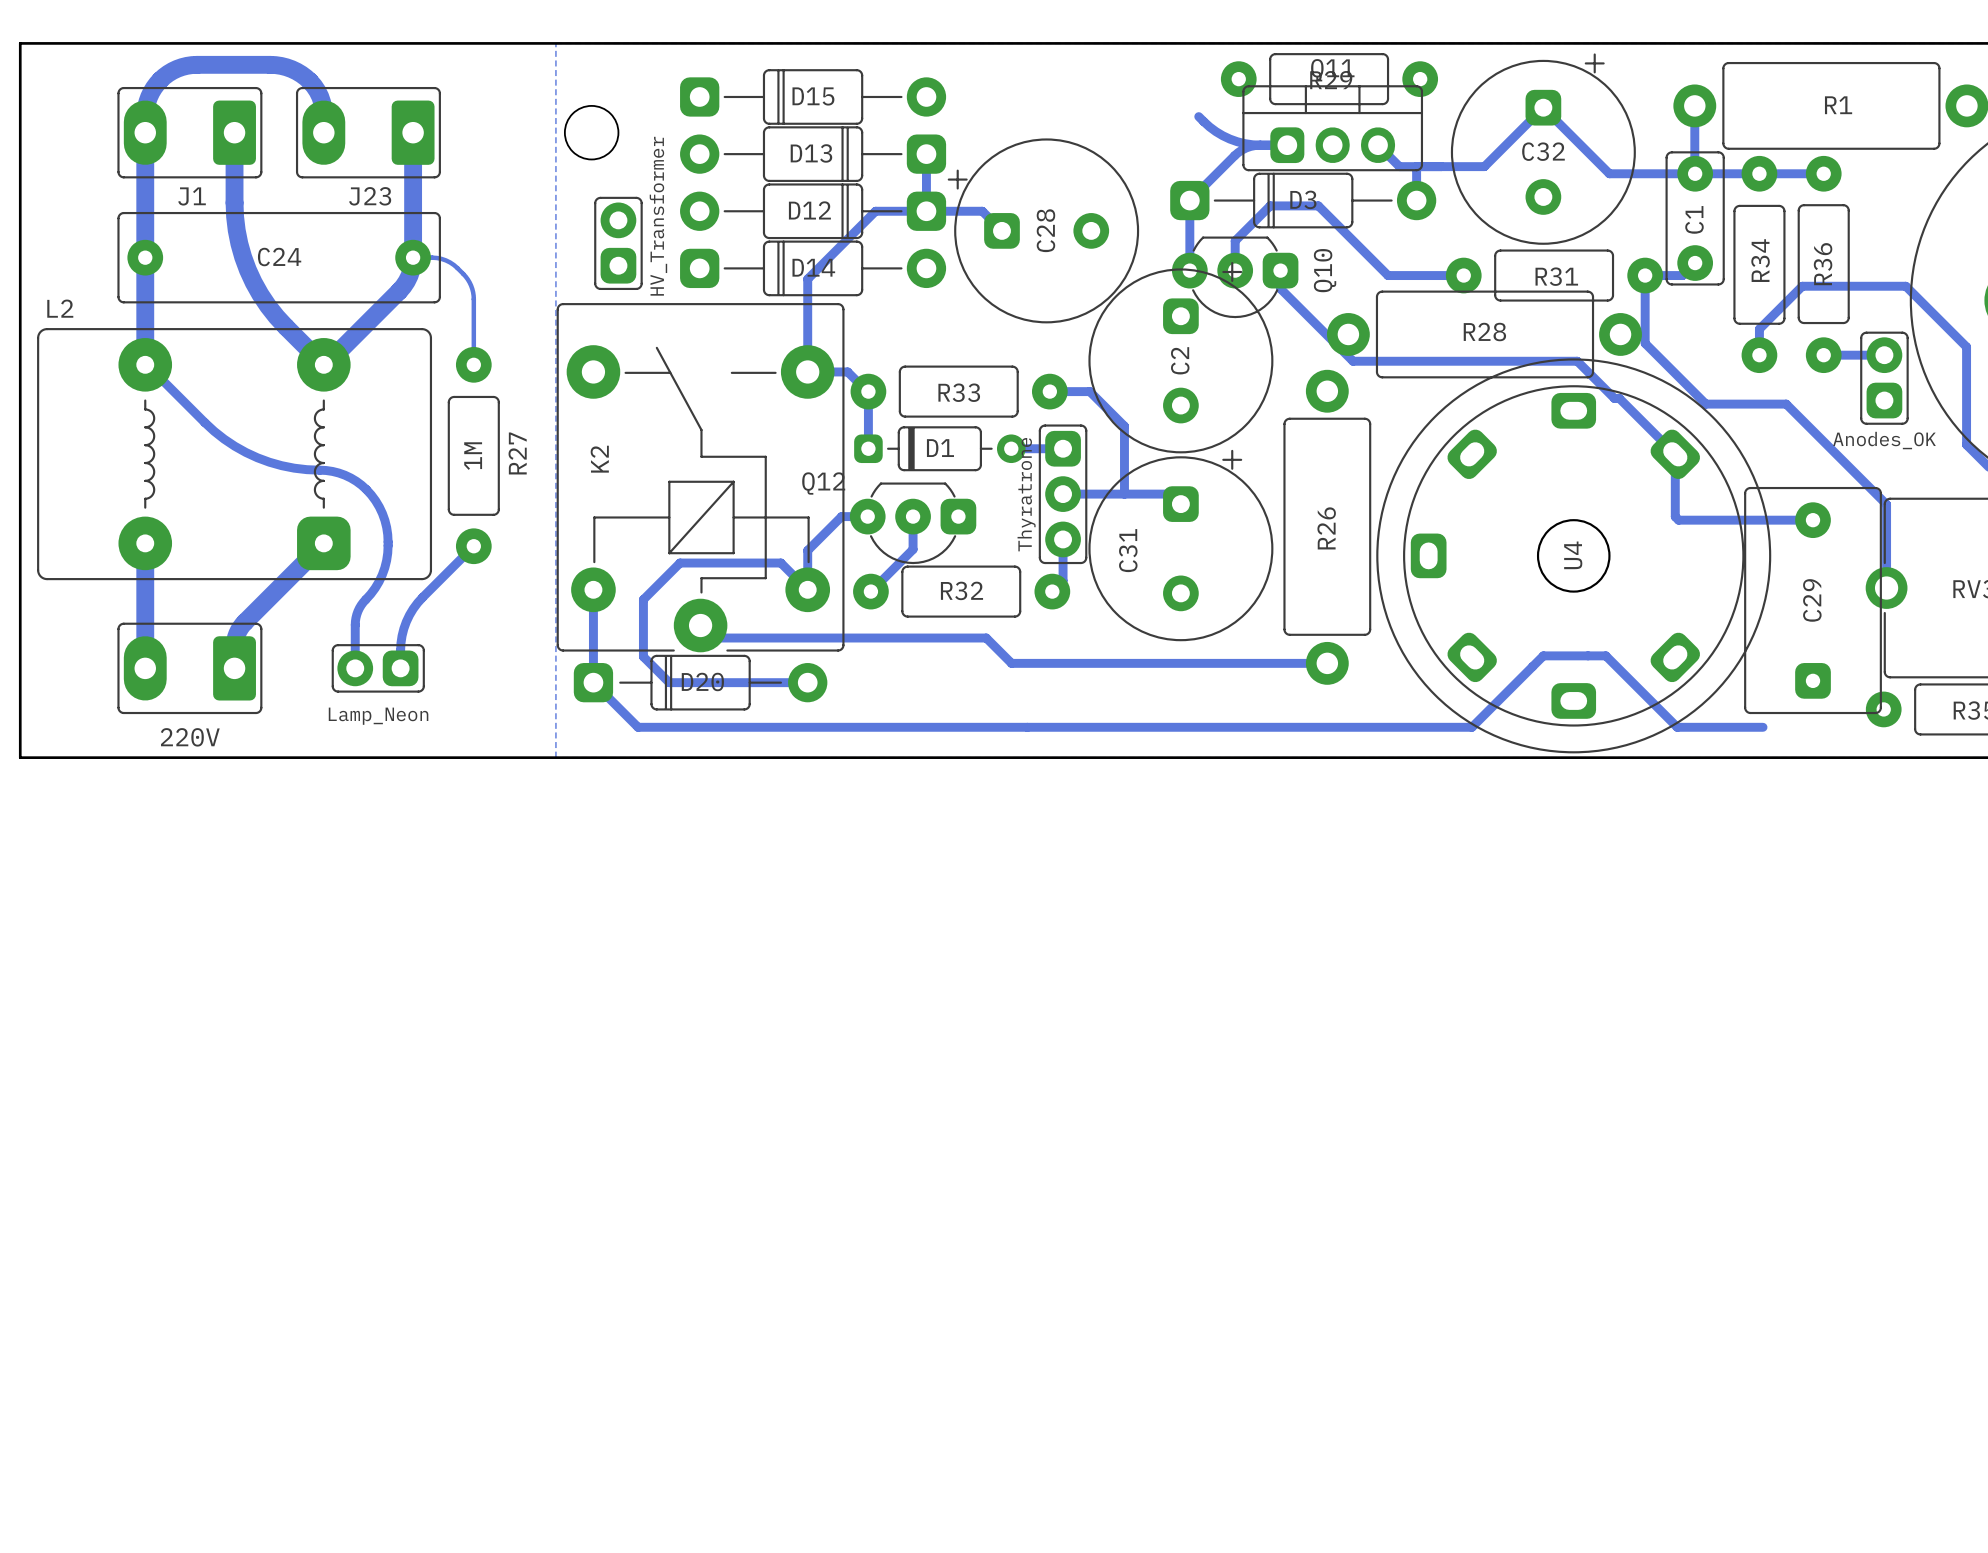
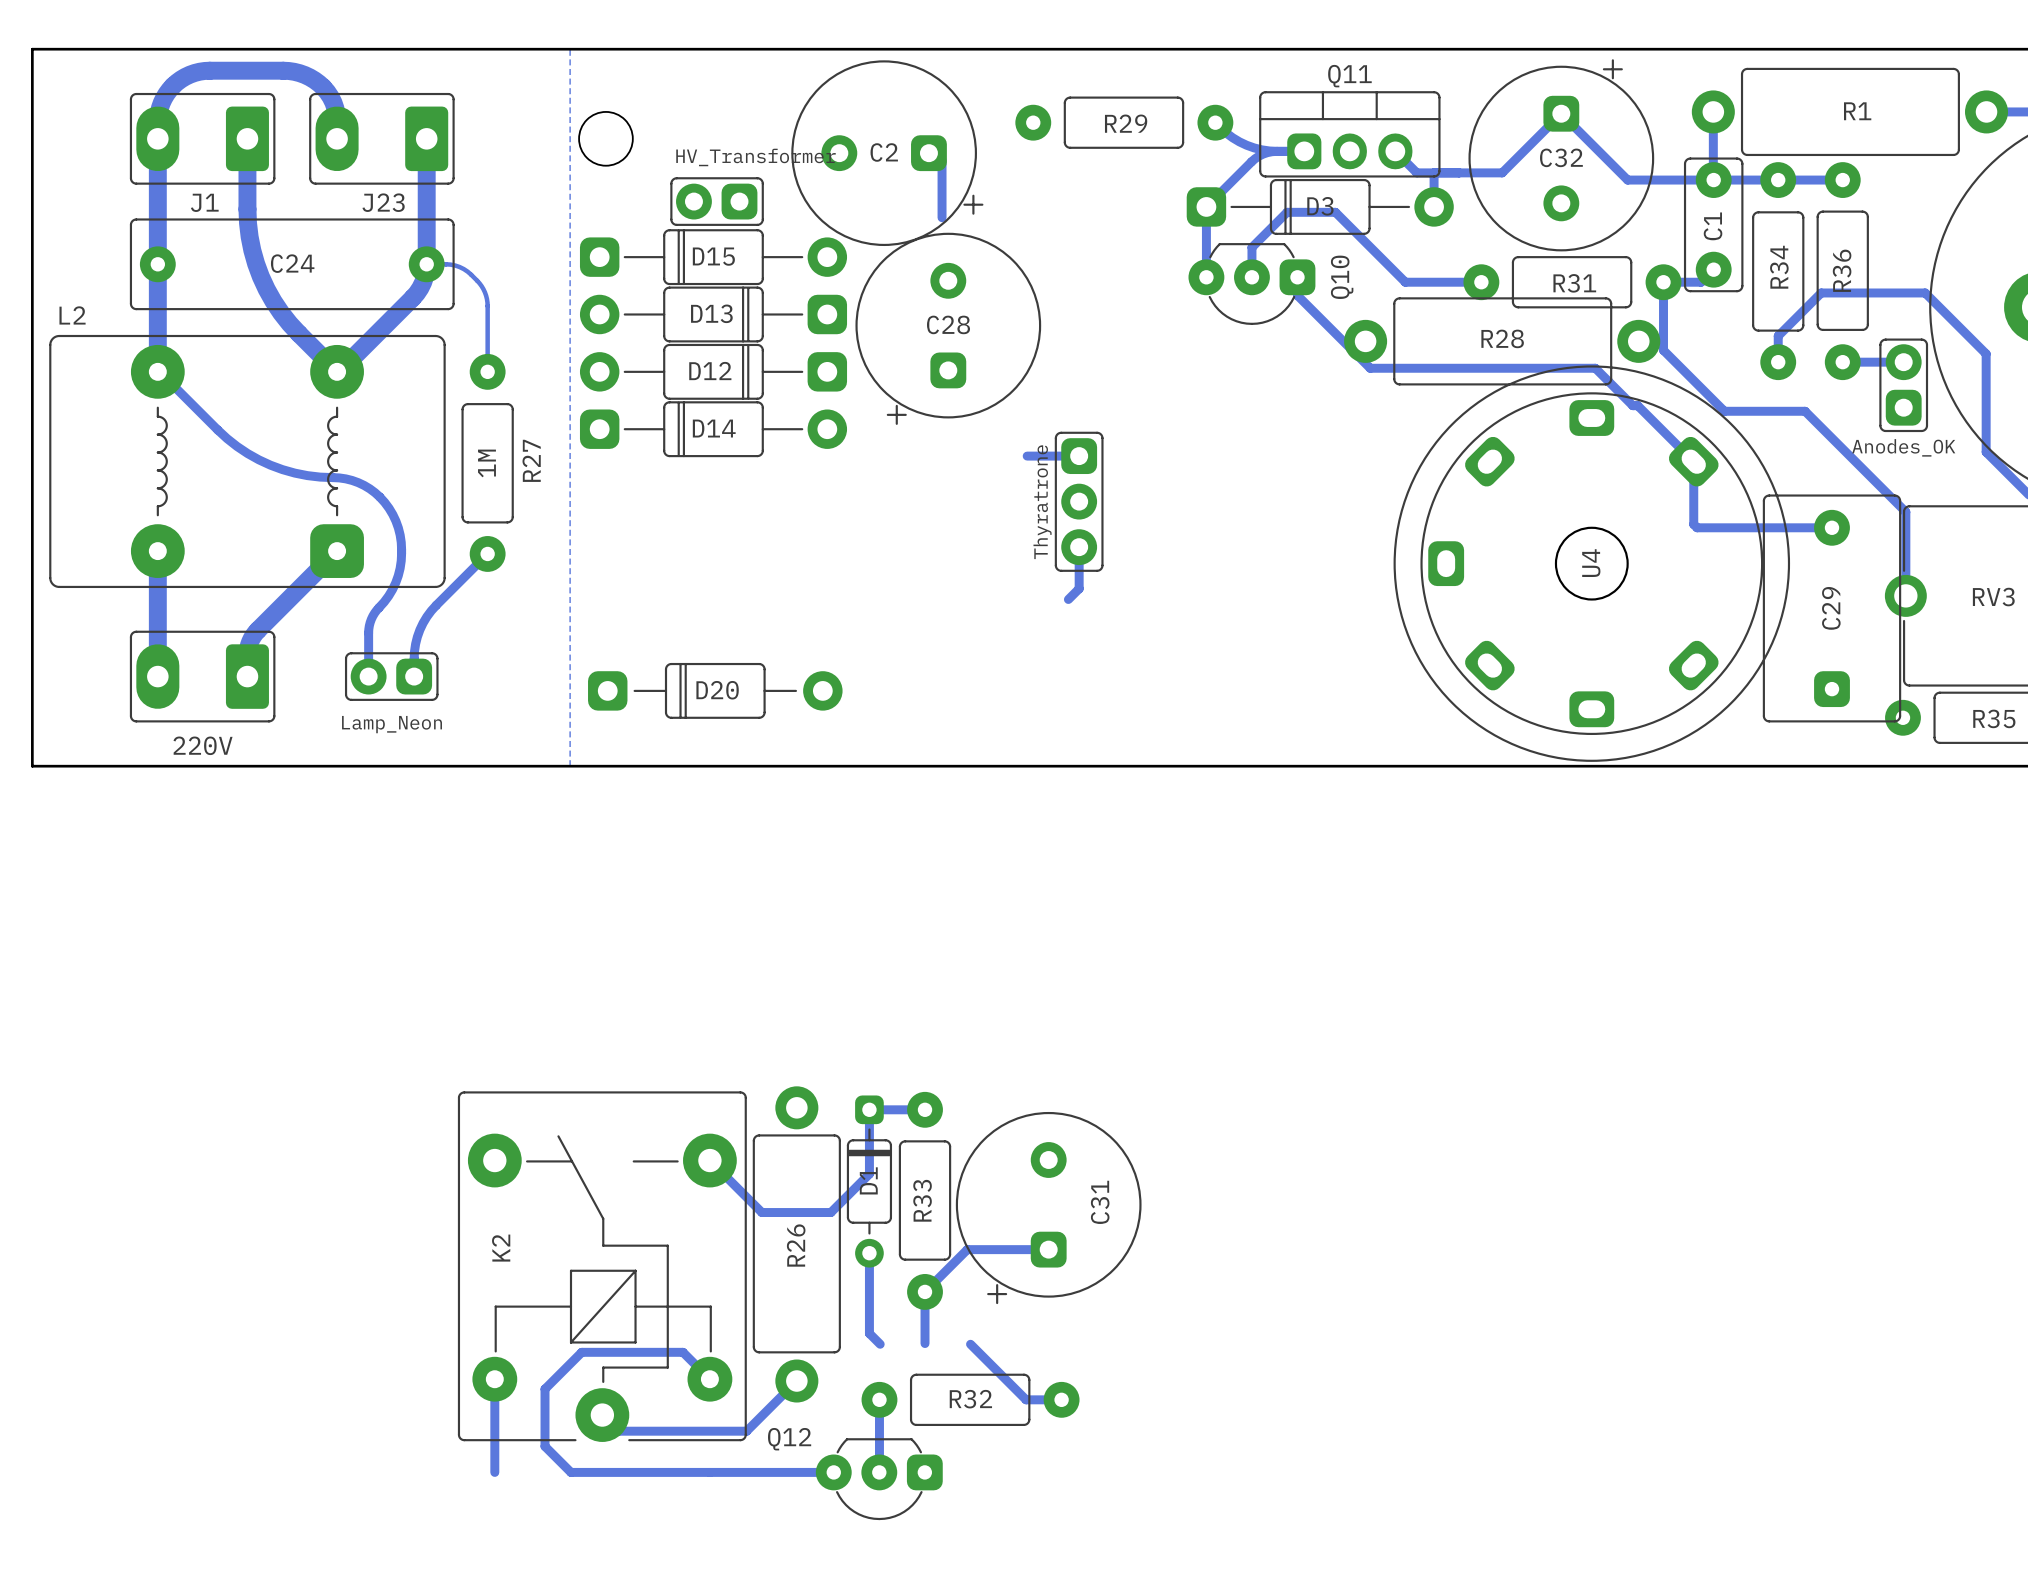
R29 position: (1329, 79) -> (1124, 122)
D15 position: (813, 96) -> (713, 257)
D13 position: (813, 154) -> (713, 314)
D12 position: (813, 211) -> (713, 371)
bottom track: (1001, 230) (982, 211) (875, 211) (807, 279) (807, 371) (847, 371) (868, 392) (868, 448) -> none
C28 rotation: 0° (1043, 230) -> 90° counterclockwise (948, 328)
C28 position: (1043, 230) -> (948, 328)
part rotation: 0° (618, 243) -> 90° counterclockwise (717, 201)
part position: (618, 243) -> (717, 201)
D14 position: (813, 268) -> (713, 429)
C2 rotation: 0° (1180, 357) -> 90° clockwise (887, 153)
C2 position: (1180, 357) -> (887, 153)
R33 rotation: 0° (959, 391) -> 90° clockwise (925, 1200)
R33 position: (959, 391) -> (925, 1200)
bottom track: (1049, 391) (1089, 391) (1124, 426) (1124, 494) -> none
D1 rotation: 0° (939, 448) -> 90° clockwise (869, 1181)
D1 position: (939, 448) -> (869, 1181)
K2 position: (700, 477) -> (602, 1266)
bottom track: (1063, 494) (1170, 494) (1180, 504) -> none
bottom track: (867, 516) (841, 516) (807, 550) (807, 589) (780, 563) (680, 563) (643, 599) (643, 656) (669, 682) (807, 682) -> none
bottom track: (913, 516) (913, 549) (870, 591) -> none
Q12 position: (913, 523) -> (879, 1479)
R26 position: (1327, 527) -> (796, 1244)
C31 rotation: 0° (1180, 545) -> 180° (1048, 1208)
C31 position: (1180, 545) -> (1048, 1208)
bottom track: (593, 589) (593, 682) (638, 727) (1471, 727) (1543, 655) (1605, 655) (1677, 727) (1763, 727) -> none
R32 position: (961, 591) -> (970, 1399)
bottom track: (700, 625) (713, 638) (986, 638) (1011, 663) (1327, 663) -> none
bottom track: none -> (925, 1109) (869, 1109) (869, 1173) (830, 1212) (761, 1212) (709, 1160)
bottom track: none -> (1048, 1249) (967, 1249) (925, 1291) (925, 1343)
bottom track: none -> (869, 1253) (869, 1333) (880, 1344)
bottom track: none -> (970, 1344) (1026, 1399) (1061, 1399)
bottom track: none -> (494, 1379) (494, 1472)
bottom track: none -> (709, 1379) (683, 1352) (581, 1352) (545, 1389) (545, 1446) (571, 1472) (833, 1472)
bottom track: none -> (796, 1381) (746, 1431) (618, 1431) (602, 1415)
bottom track: none -> (879, 1399) (879, 1472)

